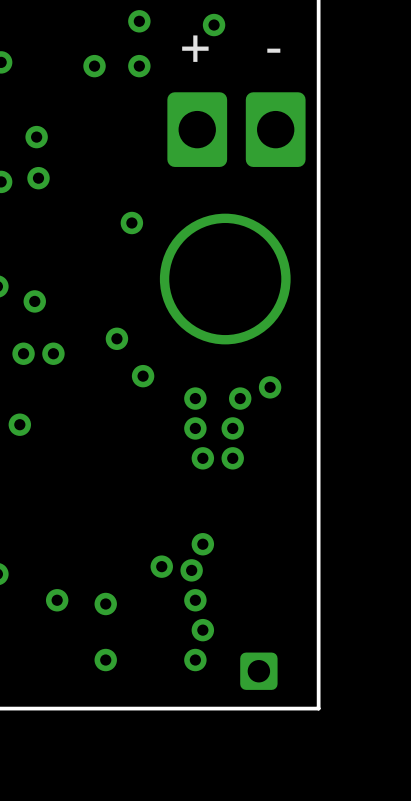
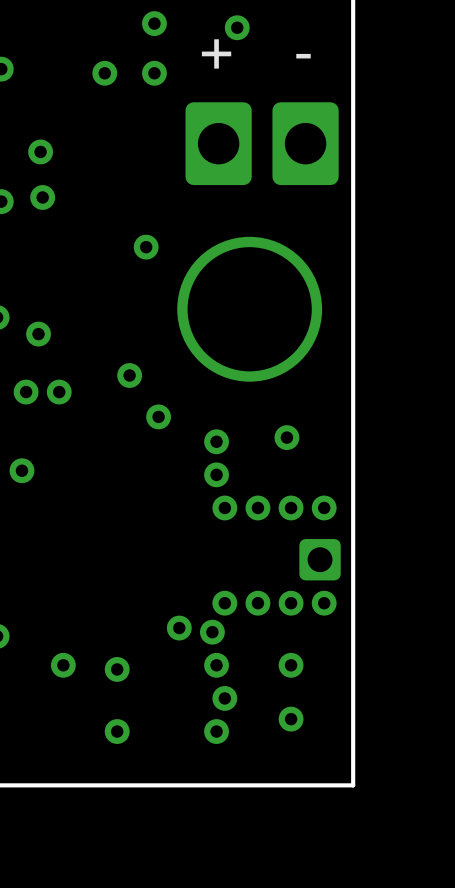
via: (270, 387) -> none
via: none -> (286, 437)
via: (240, 398) -> none
via: (232, 428) -> none
via: none -> (291, 507)
via: none -> (324, 507)
via: none -> (257, 603)
via: none -> (291, 603)
via: none -> (324, 603)
via: none -> (291, 665)
via: none -> (291, 719)
part position: (258, 671) -> (320, 559)

